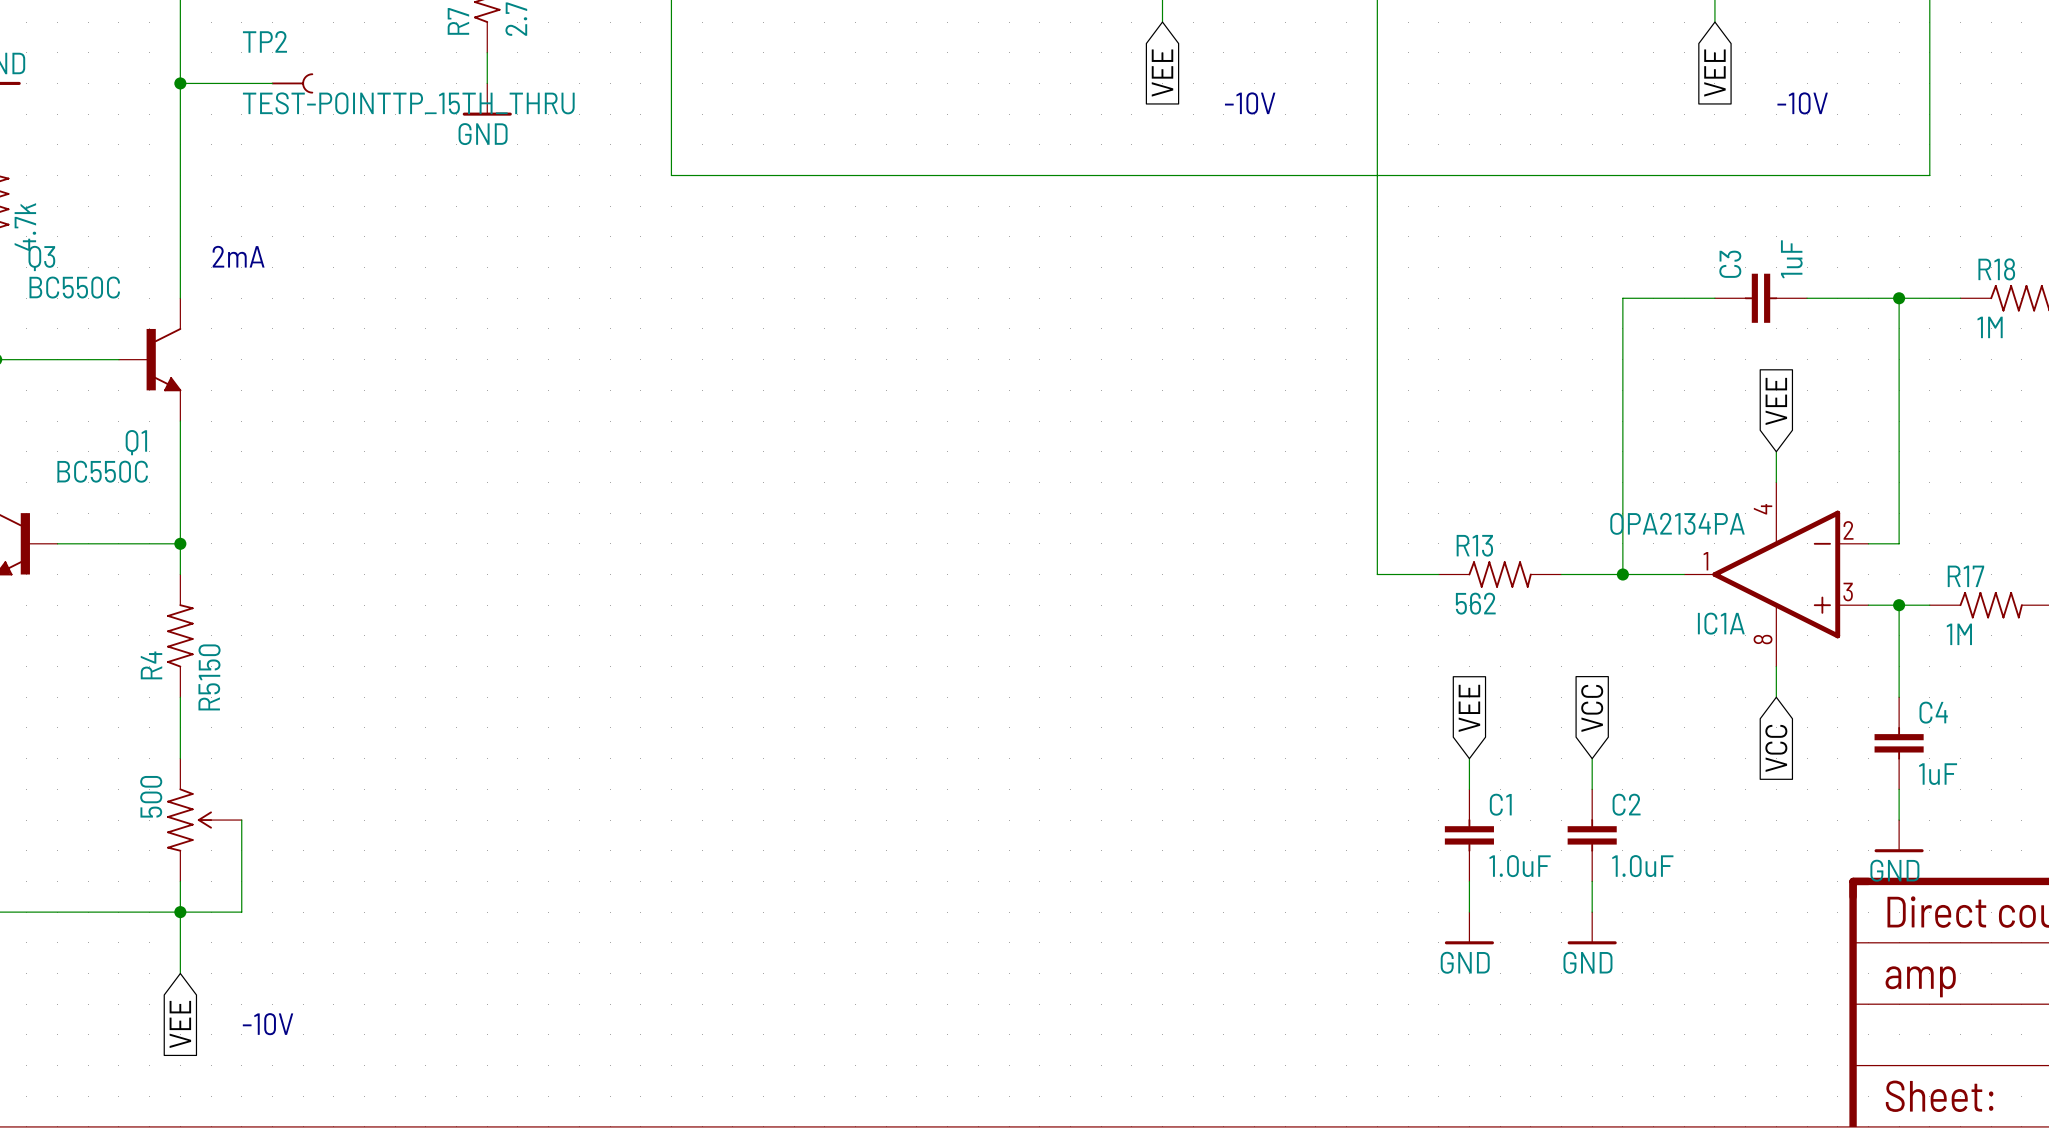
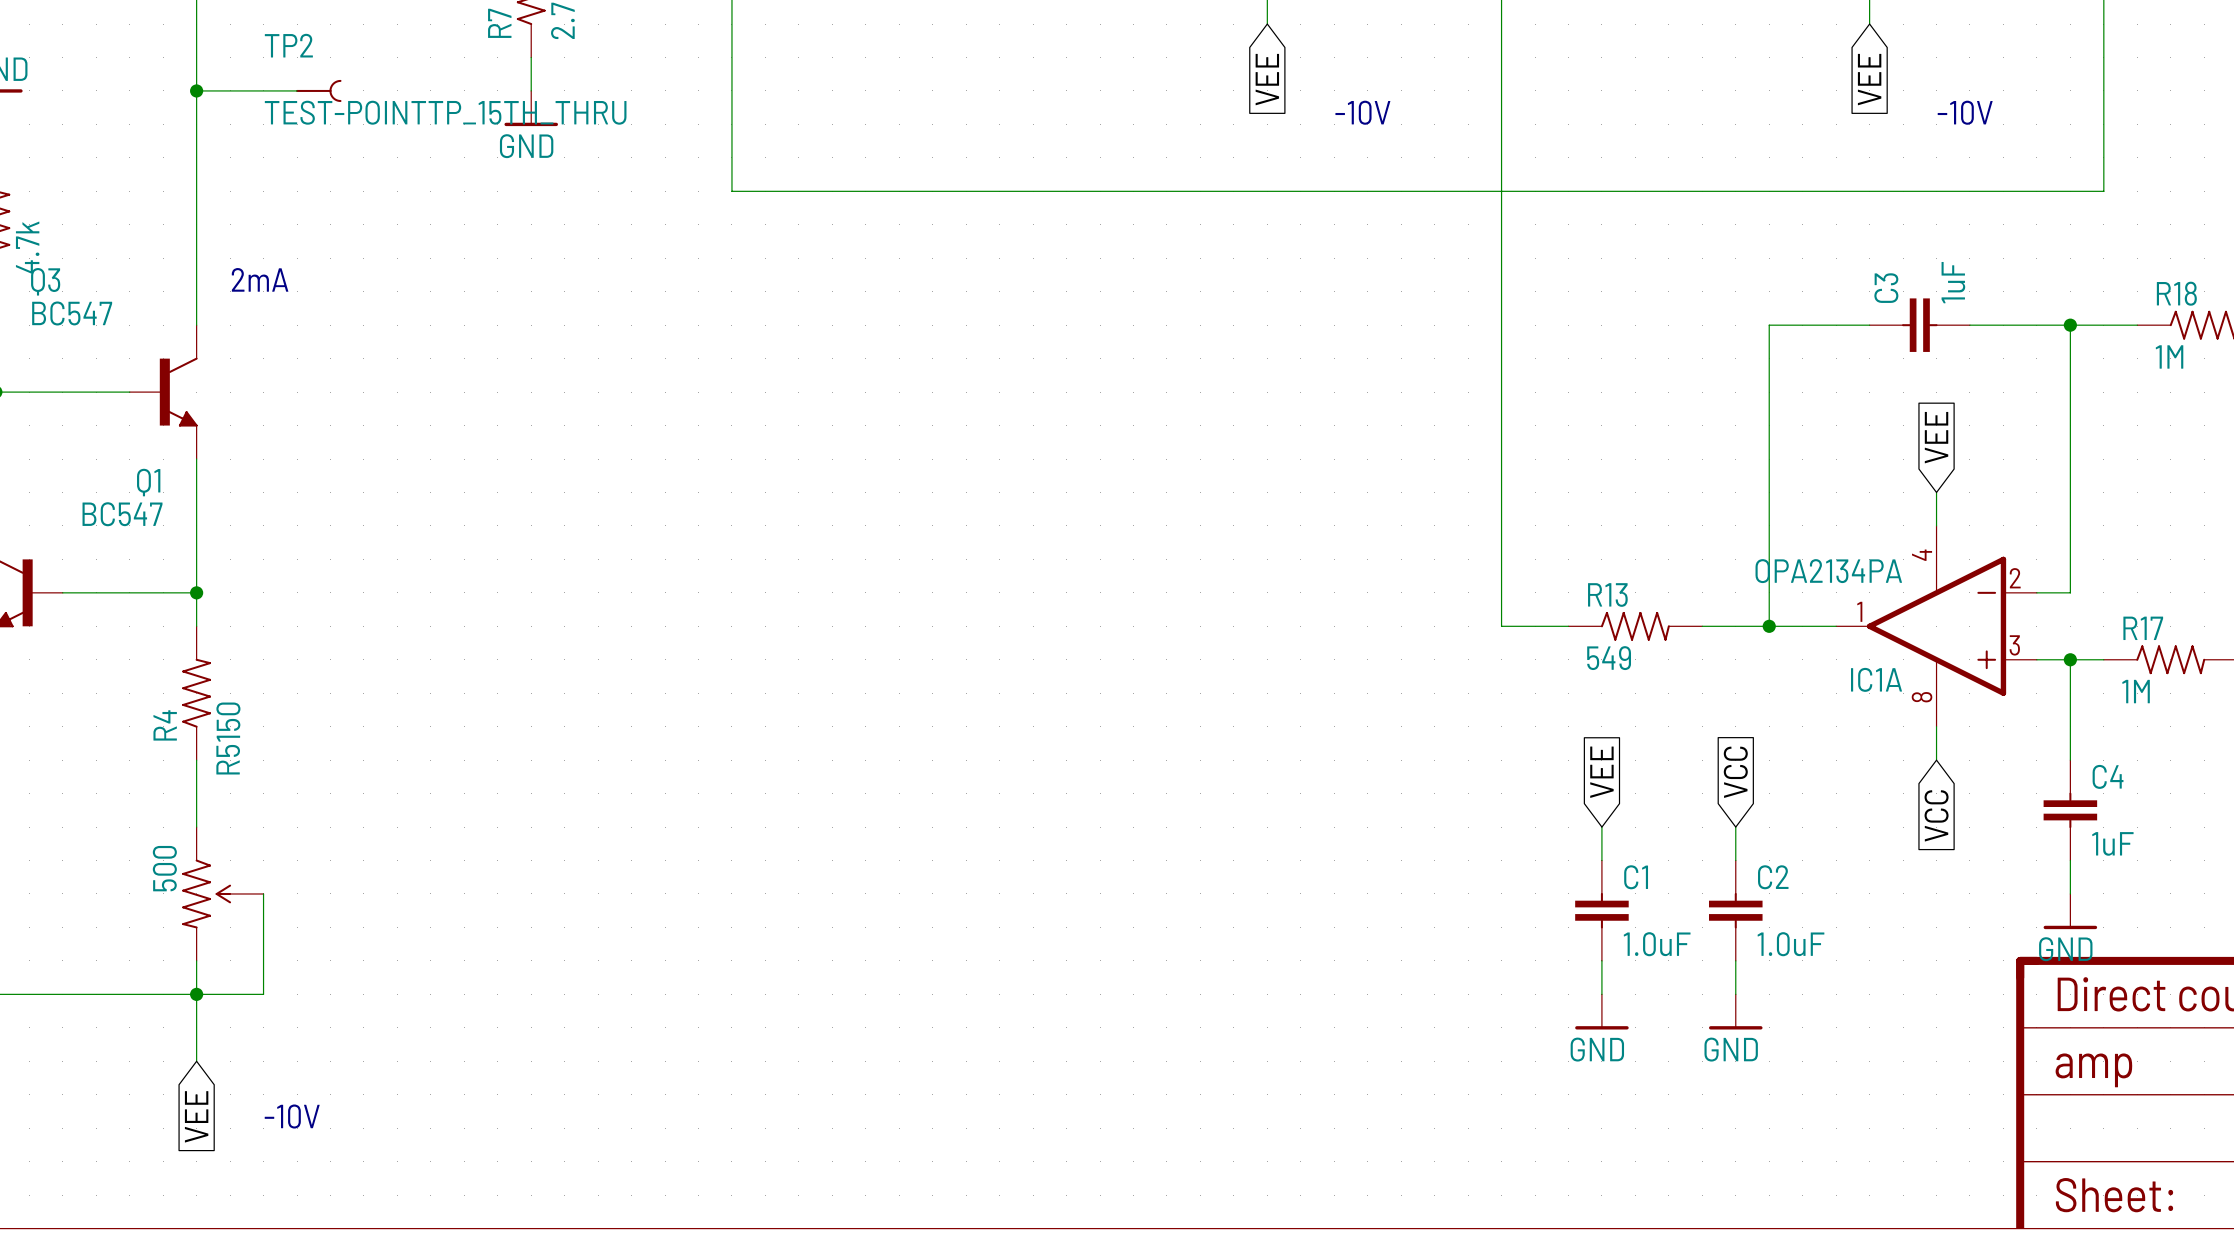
Q3 value: BC550C (74, 287) -> BC547 (72, 313)
Q1 value: BC550C (102, 471) -> BC547 (122, 514)
R13 value: 562 (1475, 603) -> 549 (1609, 658)

